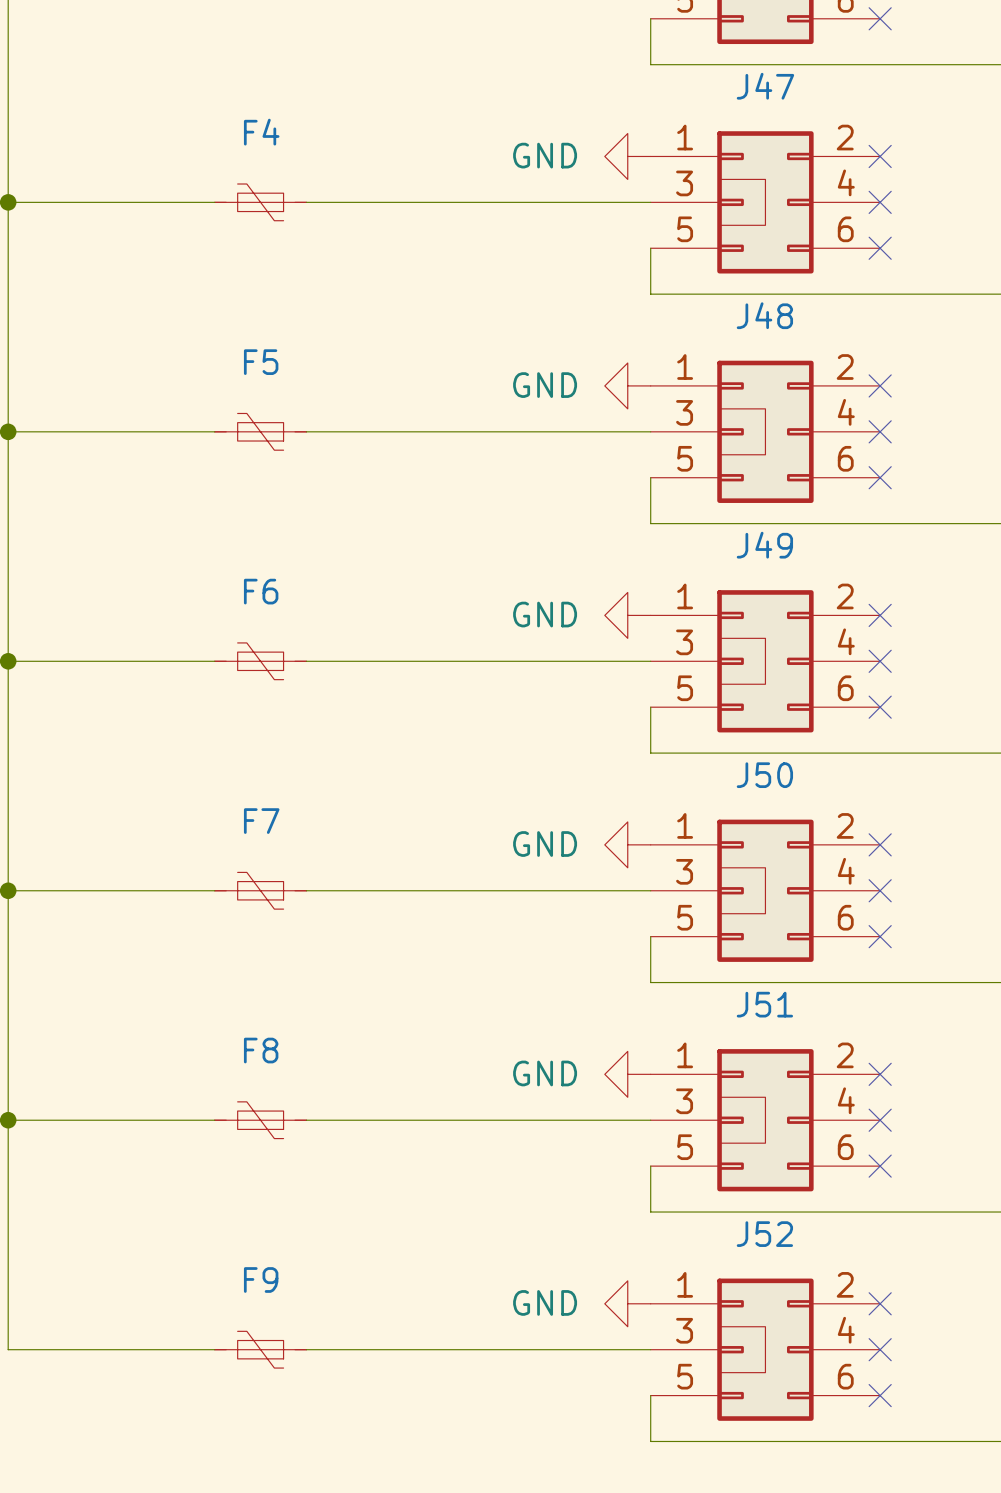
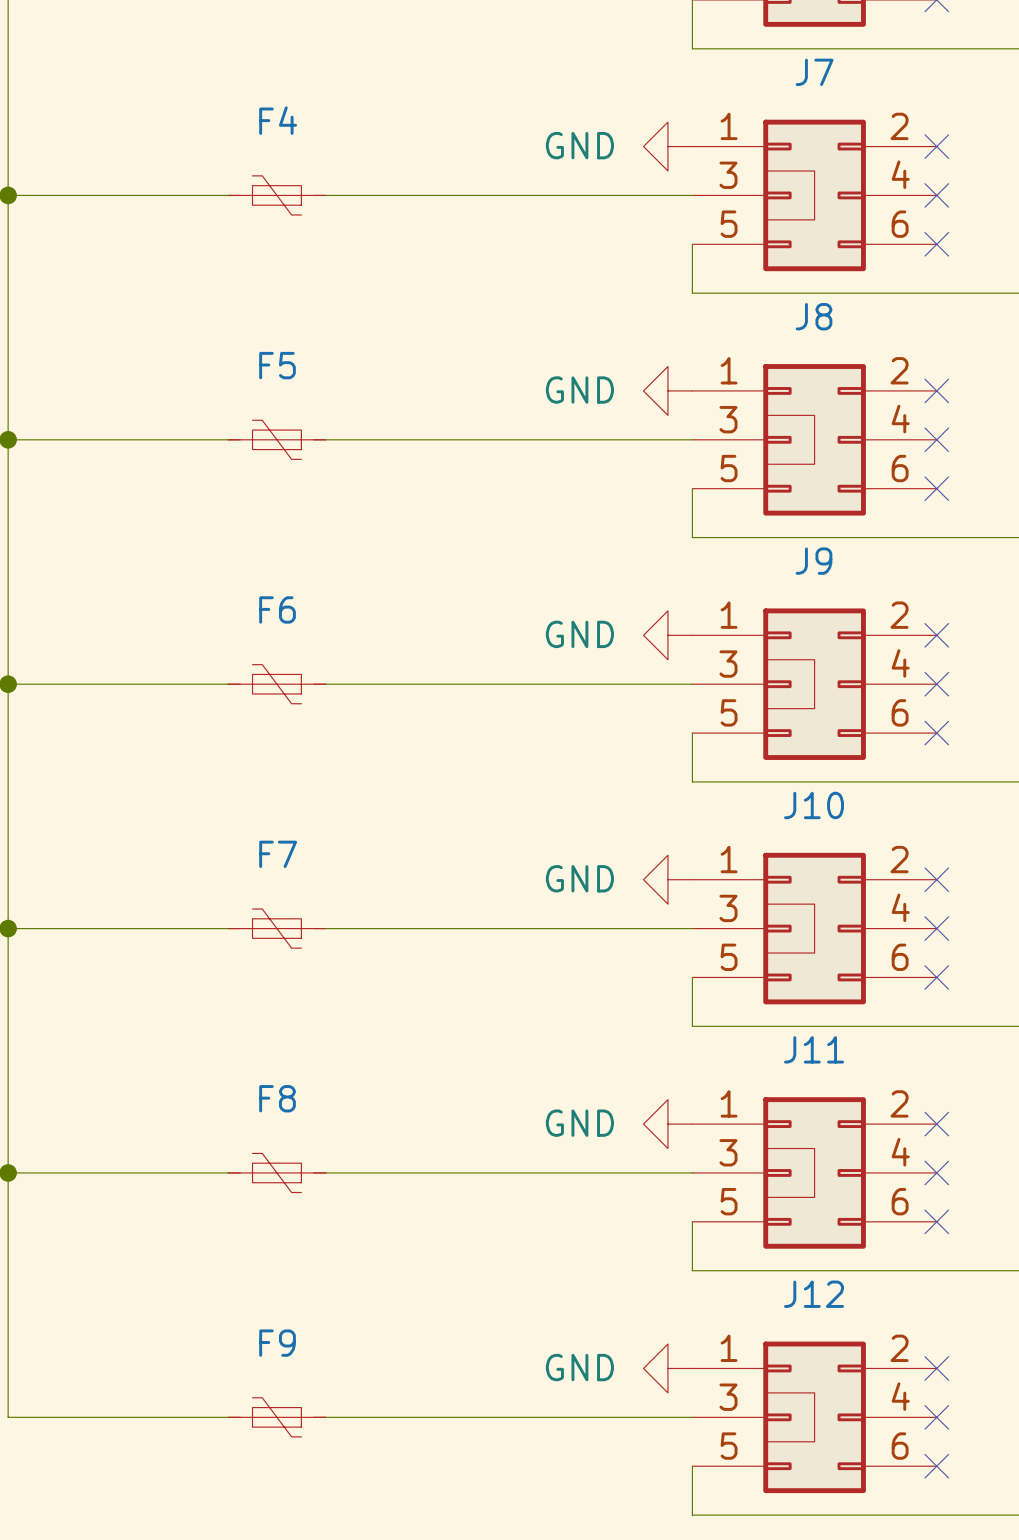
J47 name: J47 (765, 86) -> J7 (814, 72)
J48 name: J48 (764, 315) -> J8 (814, 316)
J49 name: J49 (764, 545) -> J9 (814, 561)
J50 name: J50 (764, 775) -> J10 (814, 805)
J51 name: J51 (764, 1004) -> J11 (814, 1049)
J52 name: J52 (764, 1234) -> J12 (814, 1294)

